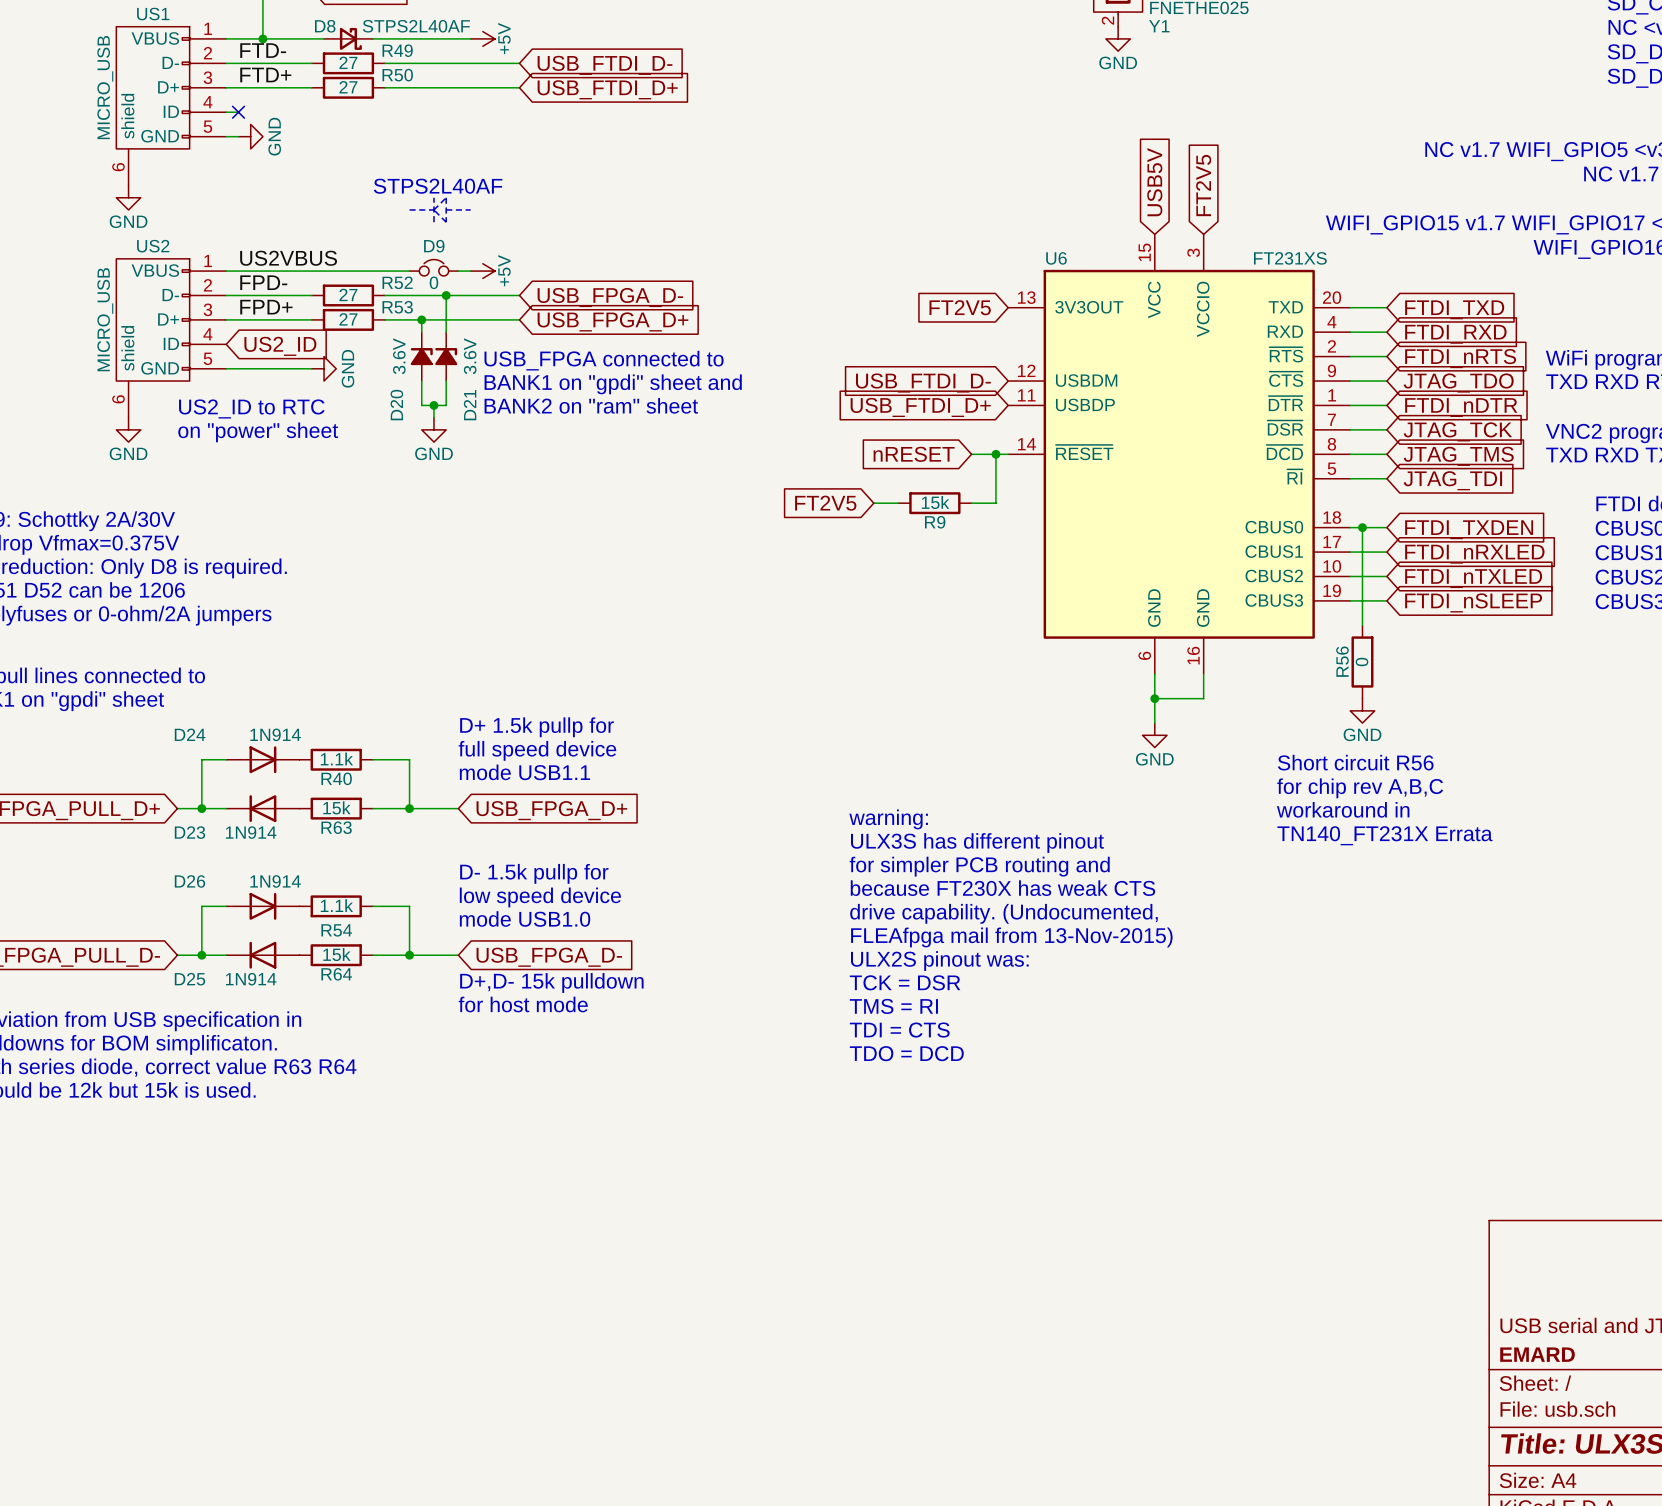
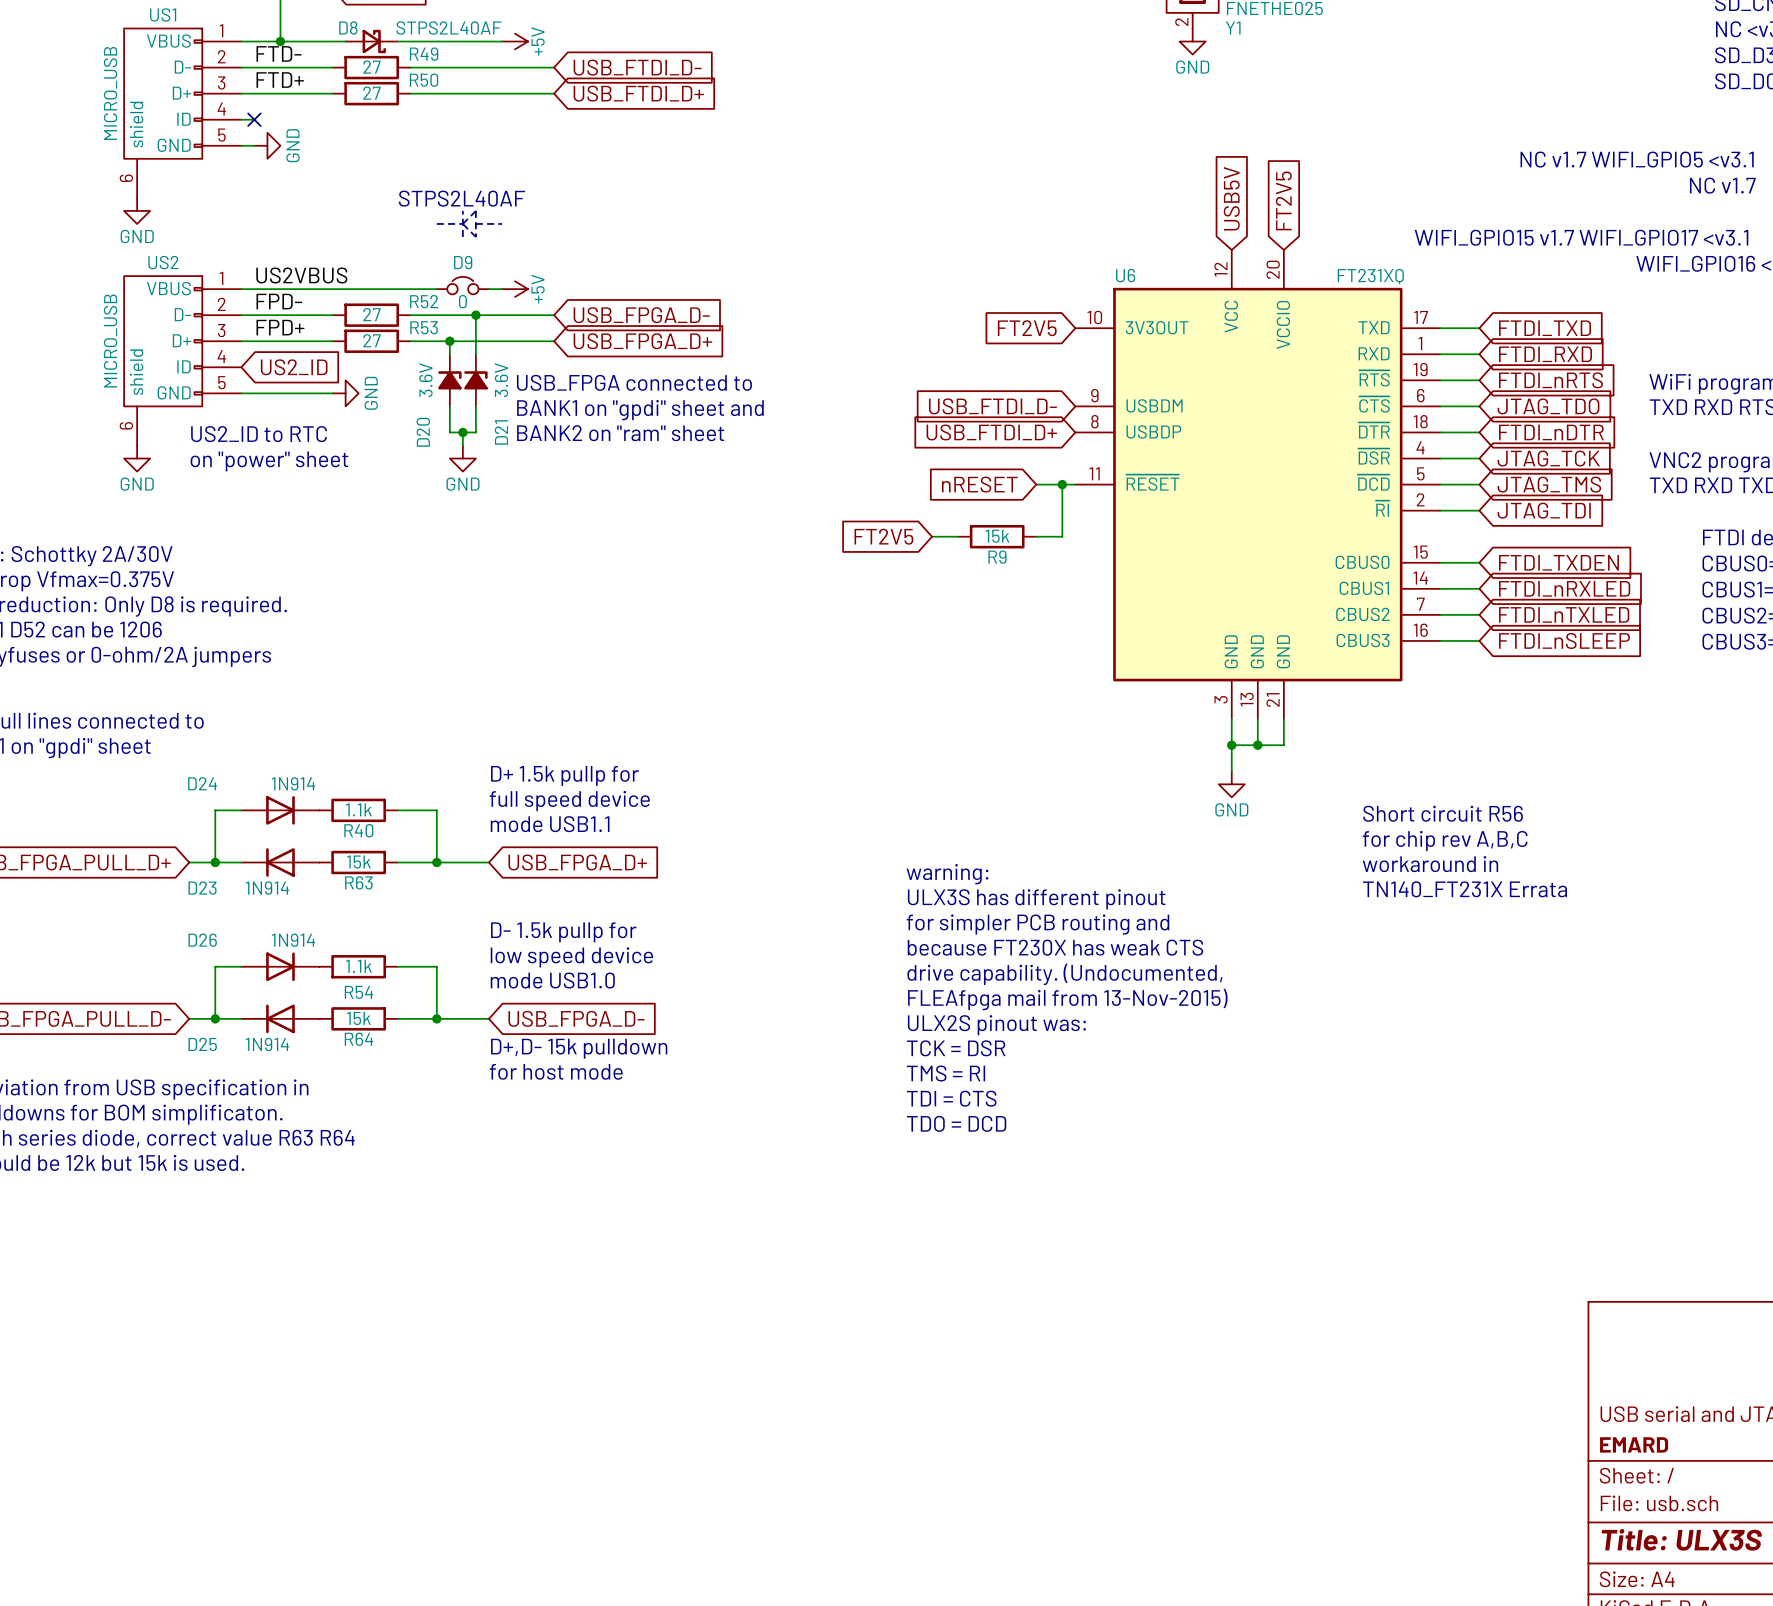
U6 symbol: [1008, 234, 1351, 675] -> [1075, 250, 1441, 720]
U6 value: FT231XS (1290, 258) -> FT231XQ (1370, 276)
wire: (1362, 527) (1362, 625) -> none
junction: (1362, 527) -> none
R56: 0 (1362, 662) -> none
wire: none -> (1257, 719) (1257, 745)
junction: none -> (1257, 745)
power symbol: GND (1362, 710) -> none

